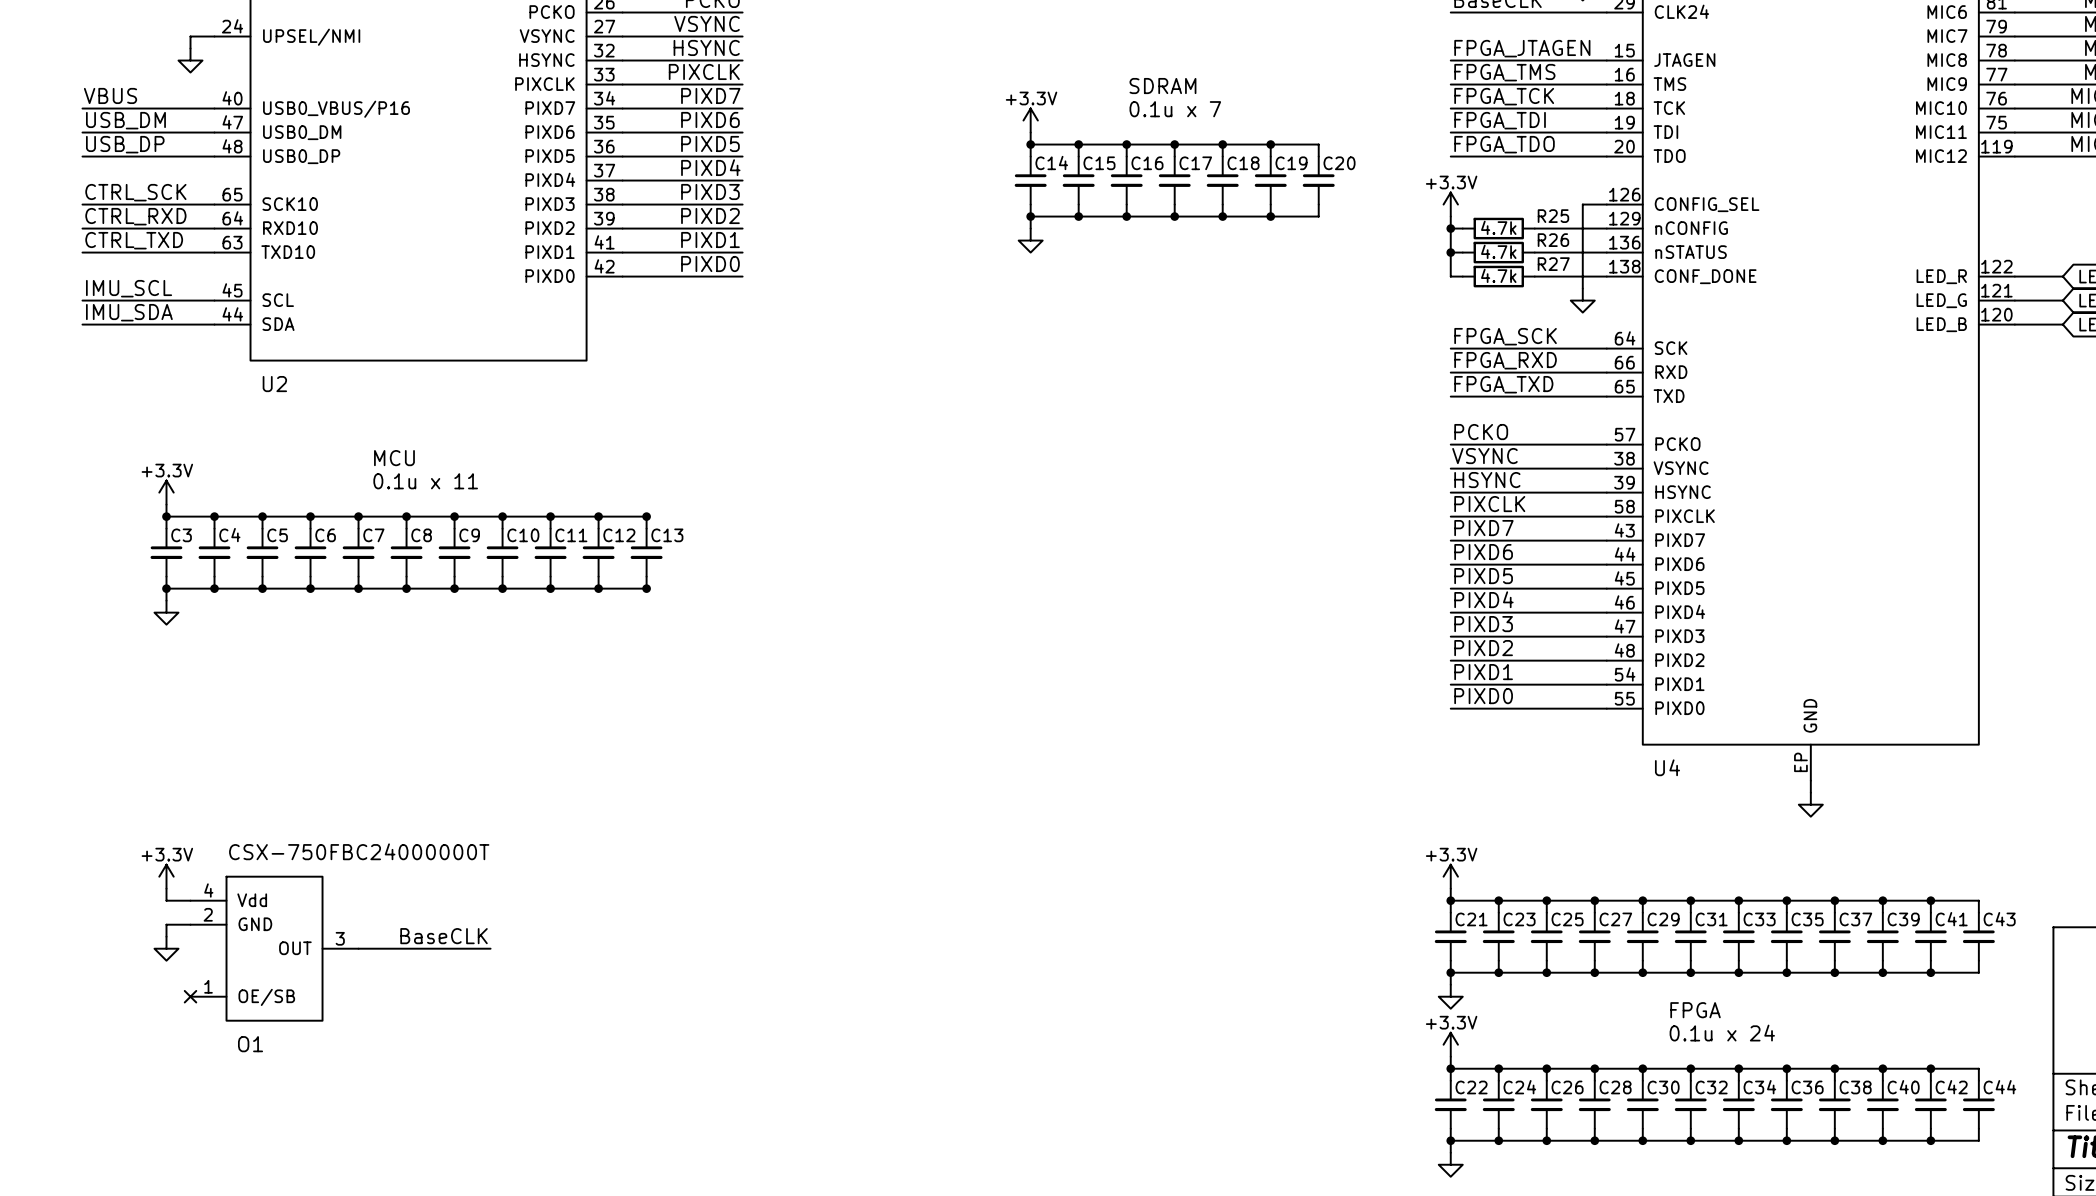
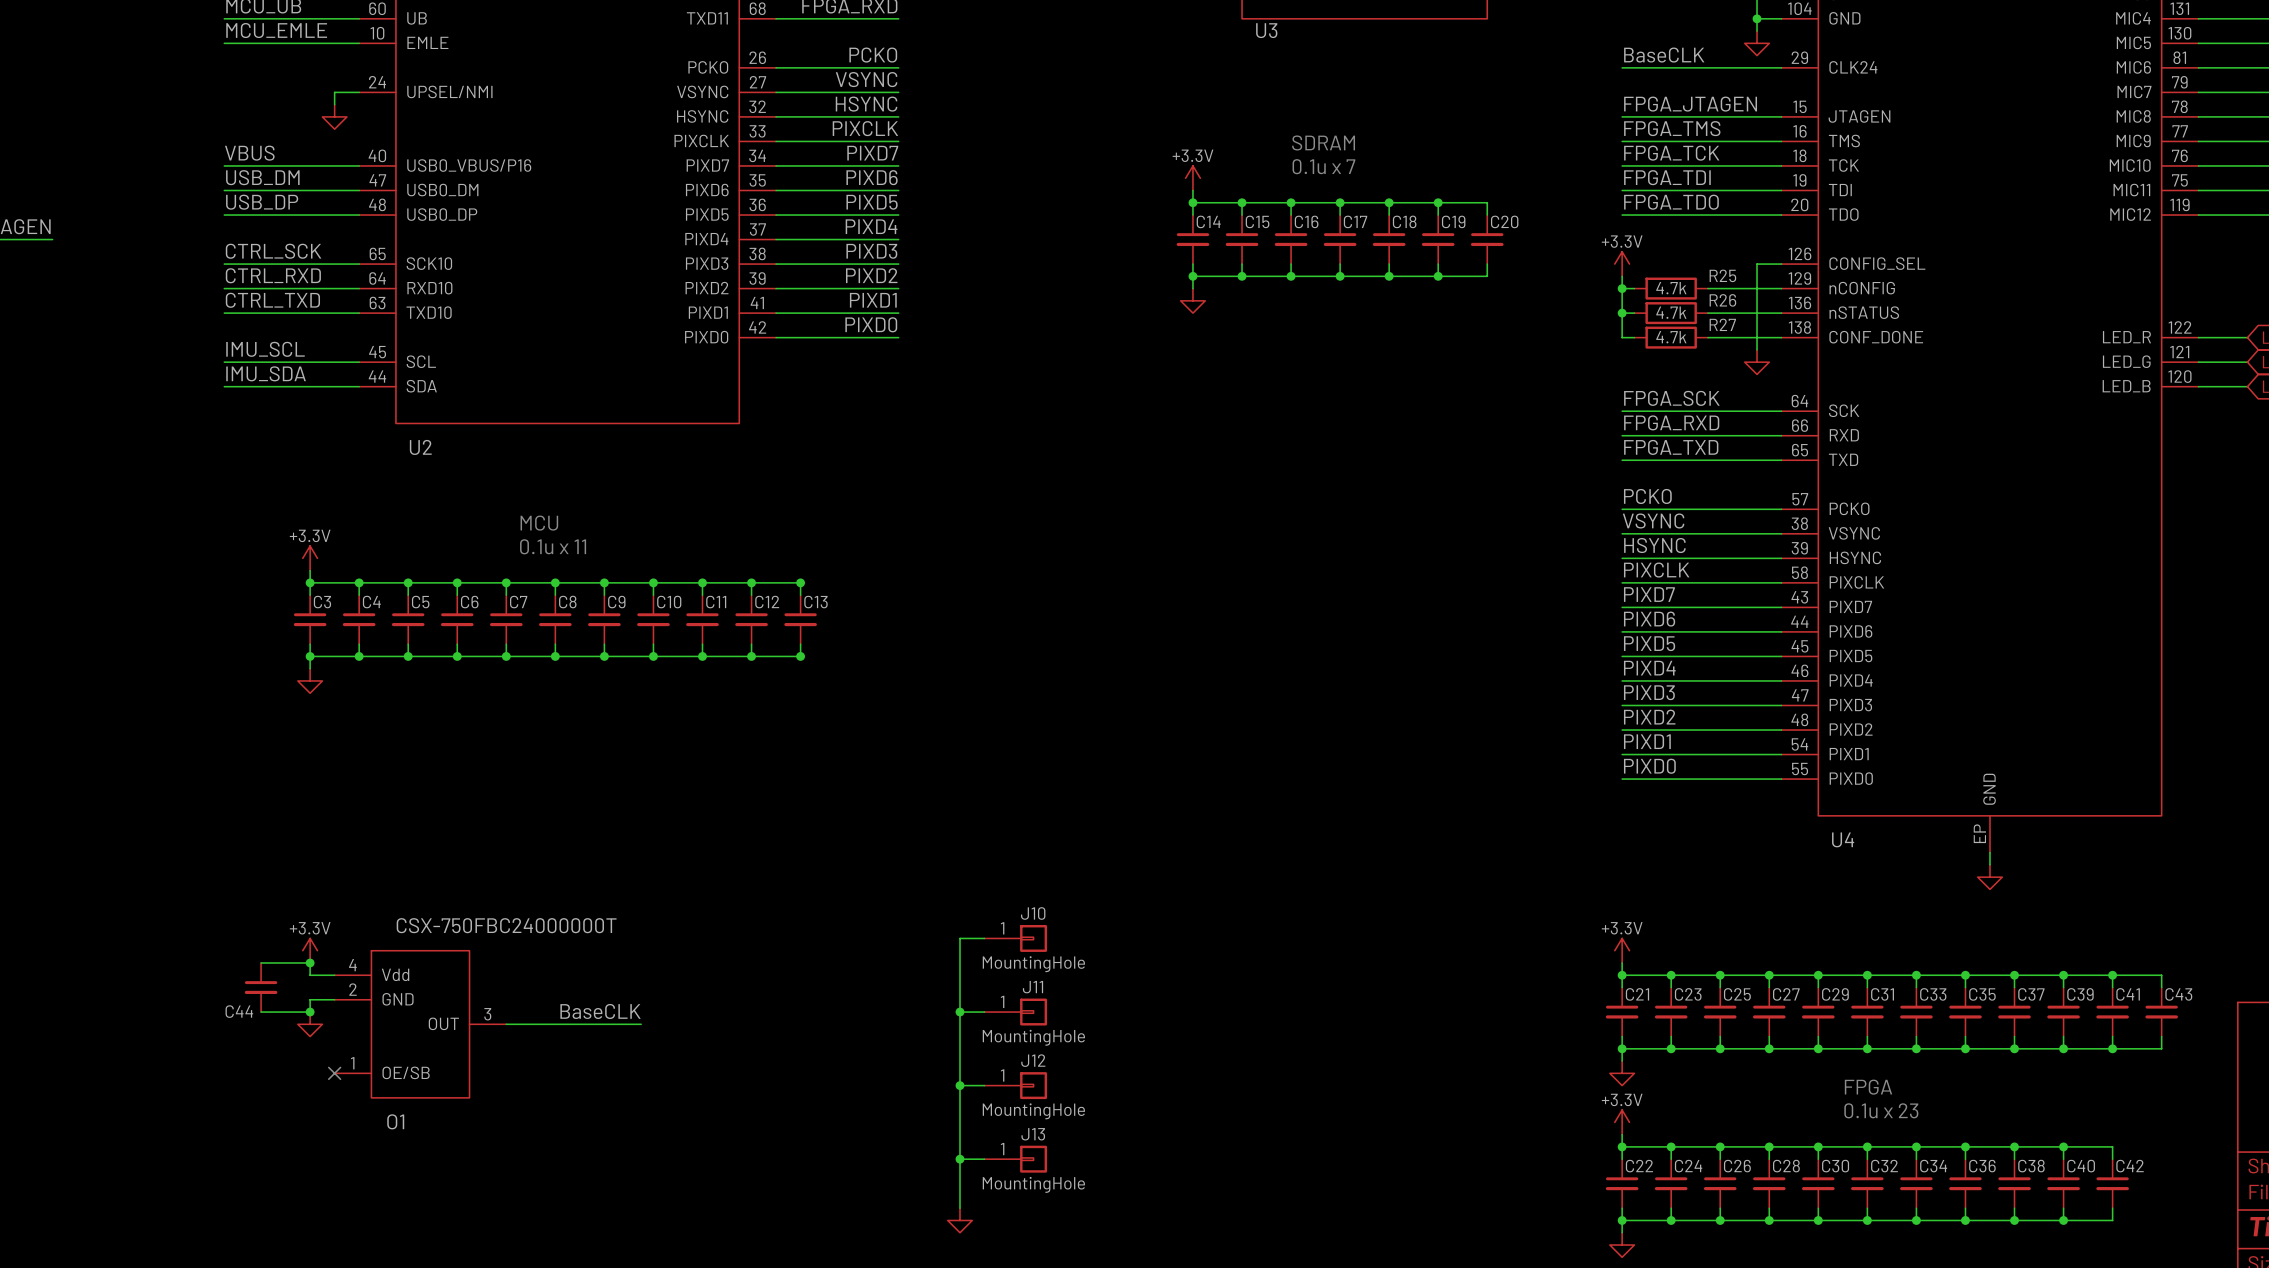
wire: none -> (984, 938) (959, 938) (959, 1208)
J10: none -> MountingHole (1015, 938)
wire: none -> (261, 962) (310, 962)
junction: none -> (310, 962)
wire: none -> (261, 1012) (310, 1012)
junction: none -> (310, 1012)
wire: none -> (959, 1012) (984, 1012)
junction: none -> (959, 1012)
J11: none -> MountingHole (1015, 1012)
wire: none -> (959, 1085) (984, 1085)
junction: none -> (959, 1085)
J12: none -> MountingHole (1015, 1085)
text: 0.1u x 24 (1722, 1033) -> 0.1u x 23 (1881, 1110)
wire: (1930, 1068) (1978, 1068) (1978, 1080) -> none
junction: (1930, 1068) -> none
wire: none -> (959, 1159) (984, 1159)
junction: none -> (959, 1159)
J13: none -> MountingHole (1015, 1159)
C44 name position: C44 (1999, 1087) -> C44 (239, 1011)
C44 position: (1978, 1104) -> (261, 987)
wire: (1978, 1128) (1978, 1140) (1930, 1140) -> none
power symbol: none -> (959, 1220)
junction: (1930, 1140) -> none

